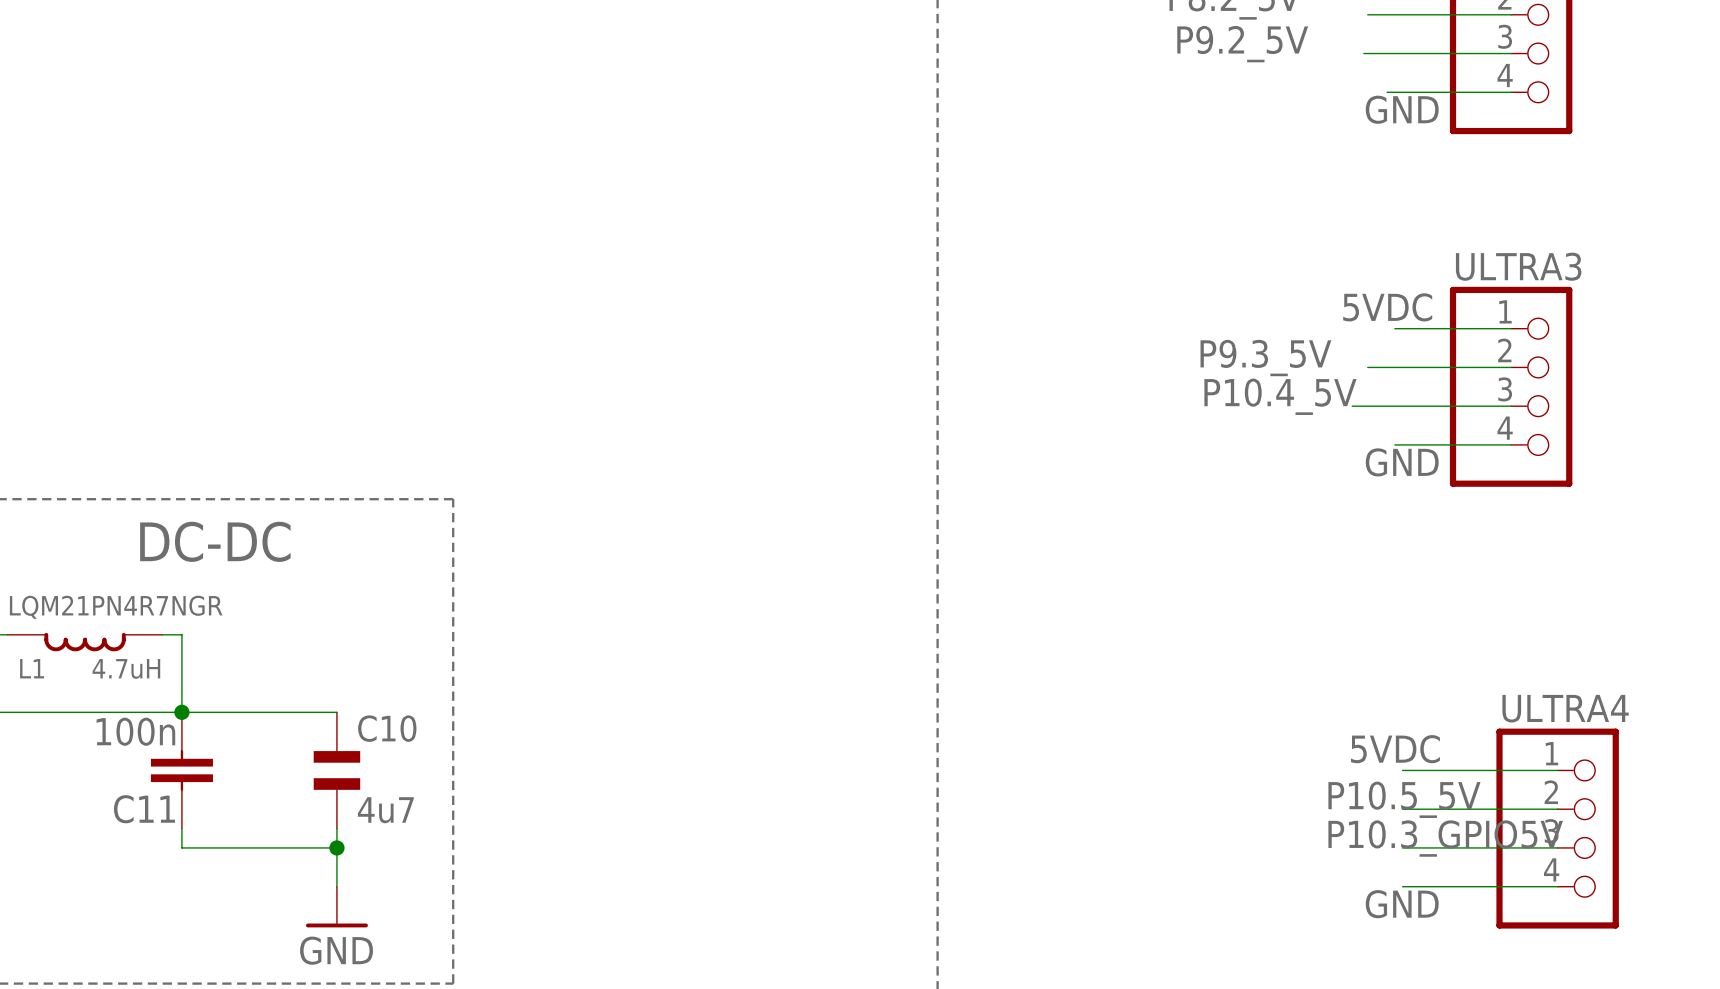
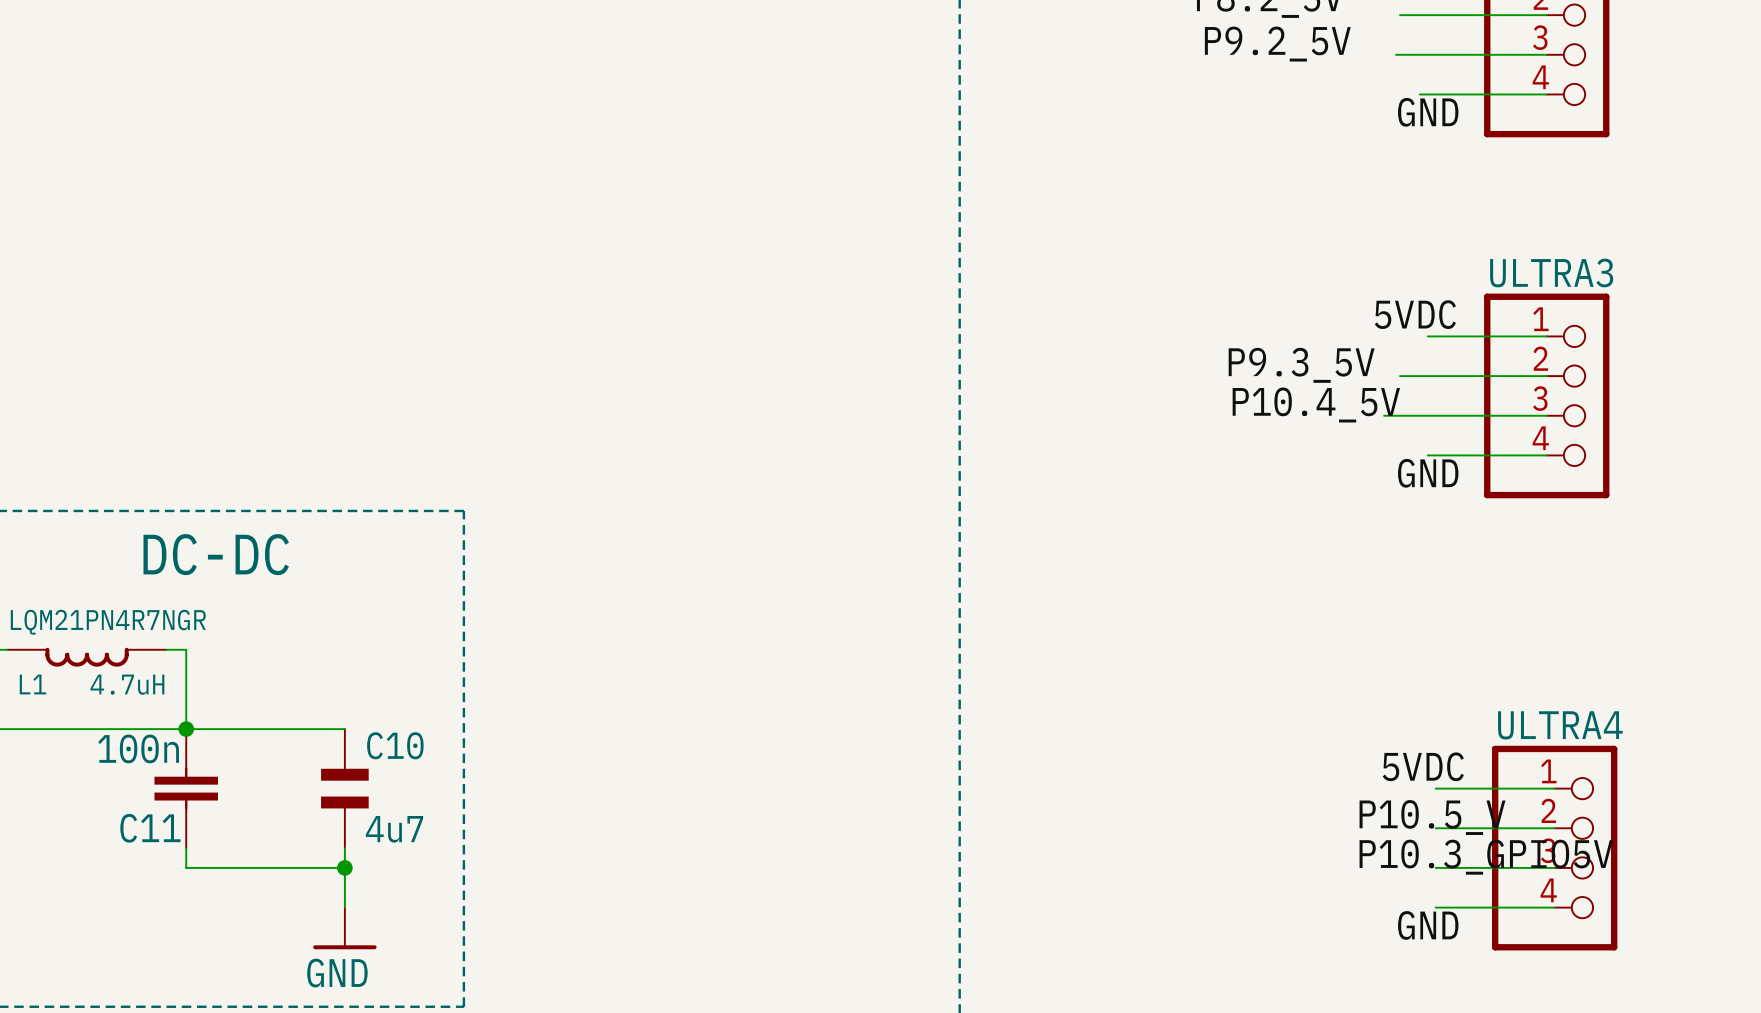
wire: (1518, 770) (1557, 770) -> none
label: P10.5_5V (1404, 799) -> P10.5_V (1432, 817)
wire: (1518, 809) (1557, 809) -> none
ULTRA4 position: (1557, 828) -> (1554, 848)
wire: (1518, 847) (1557, 847) -> none
wire: (1518, 886) (1557, 886) -> none

